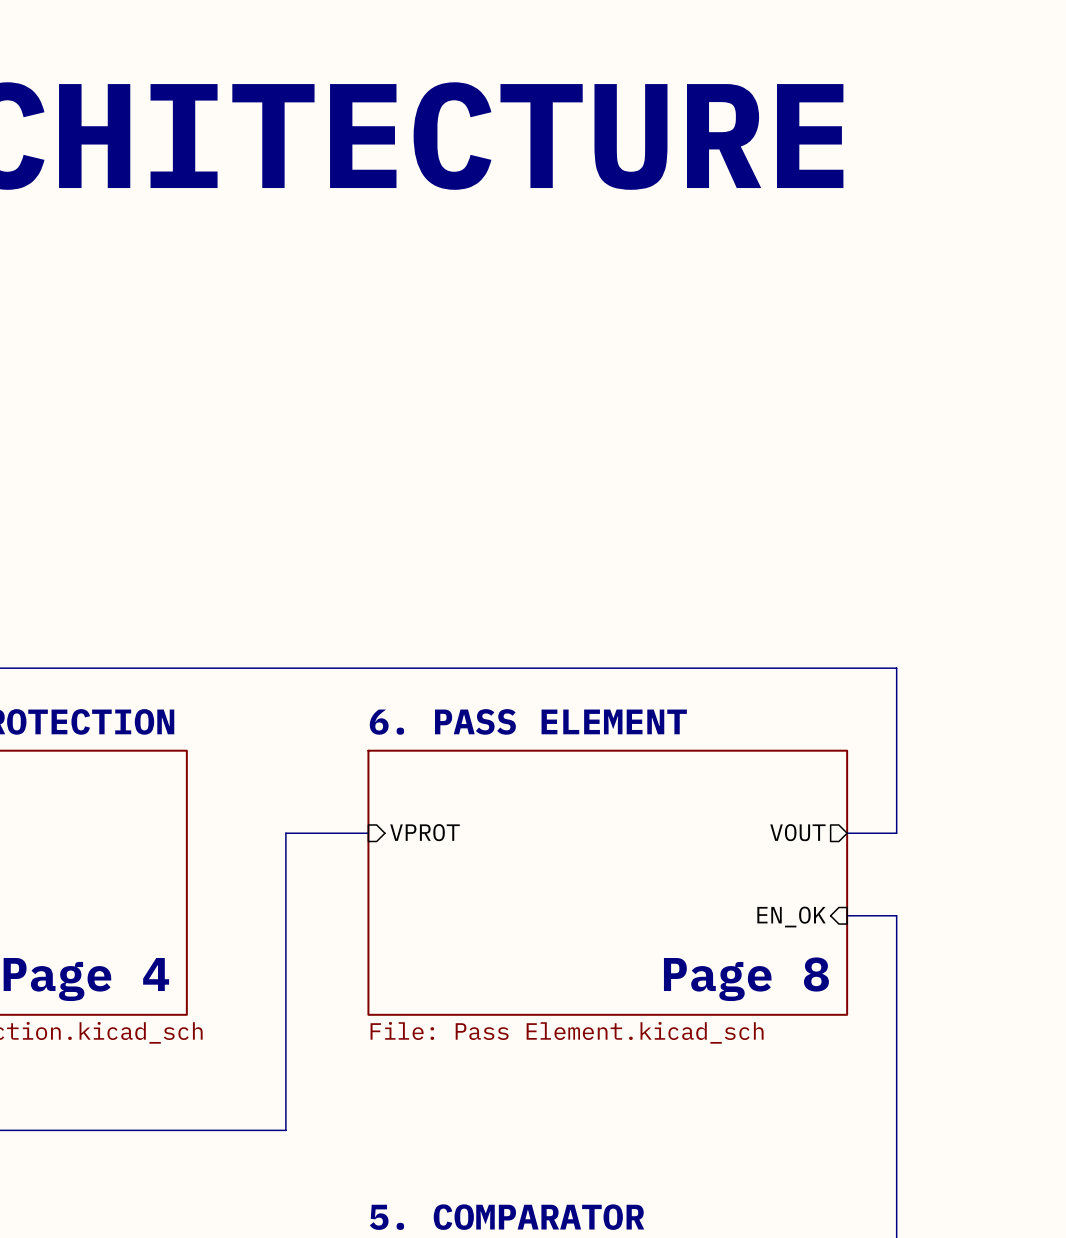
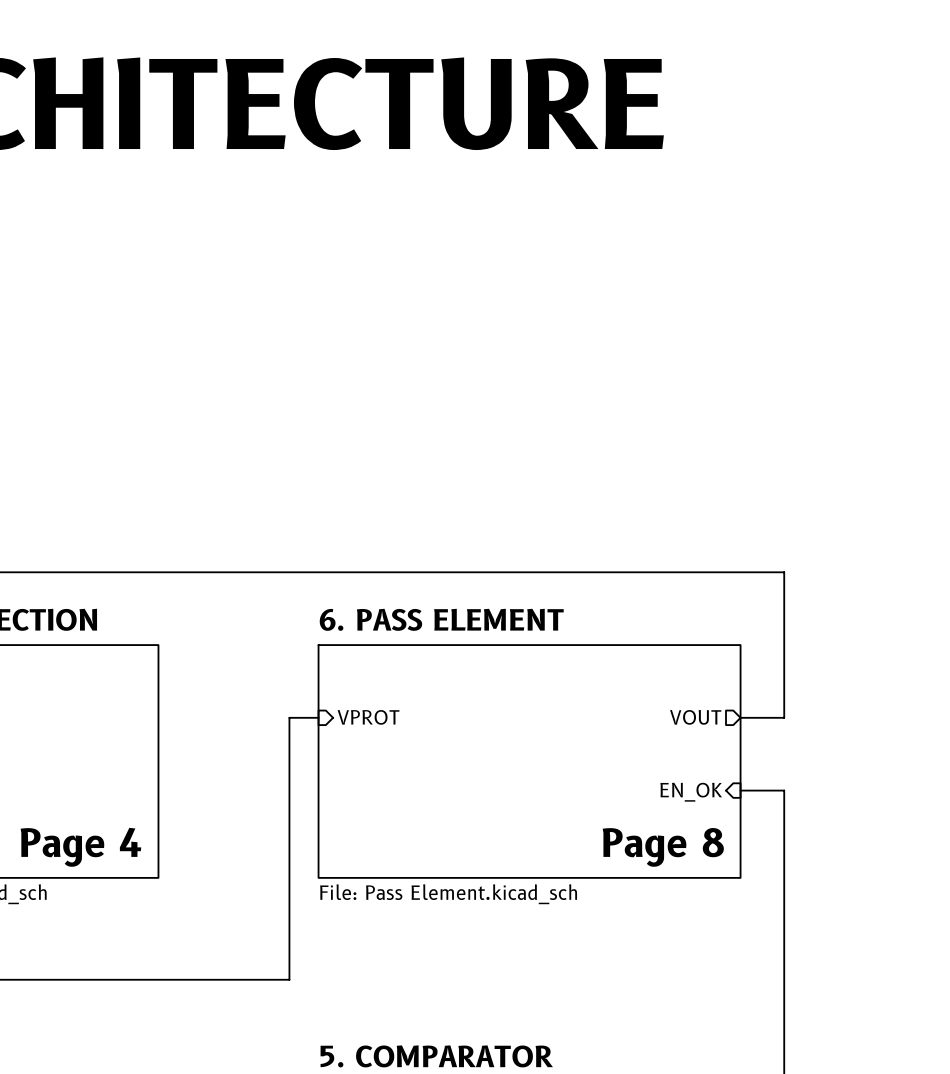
wire: (335, 833) (285, 833) (285, 1130) -> (289, 717) (289, 979) (245, 979)

